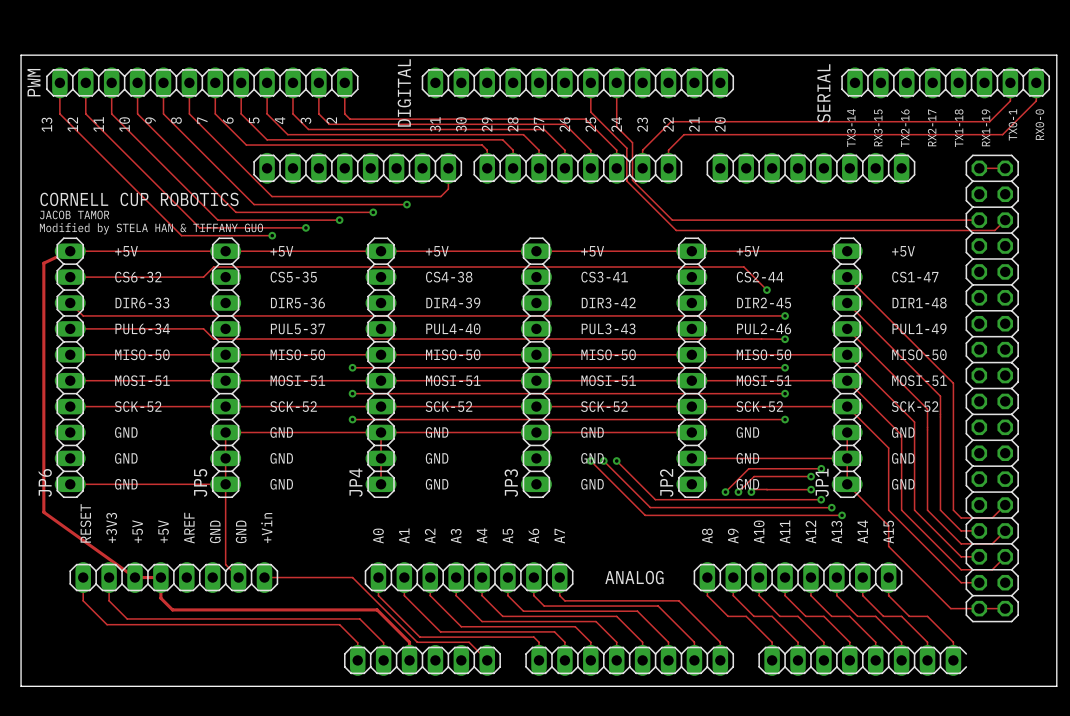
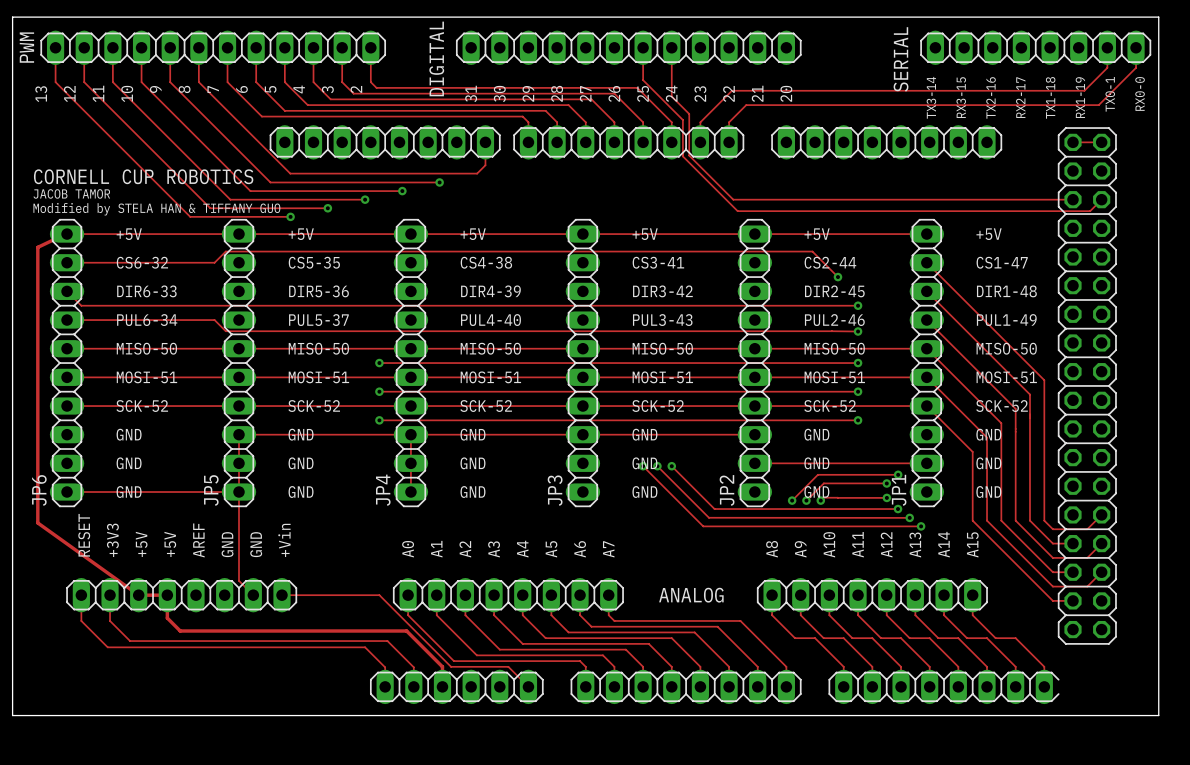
track: (847, 432) (847, 484) (888, 525) (888, 546) (950, 608) (1005, 608) -> none

